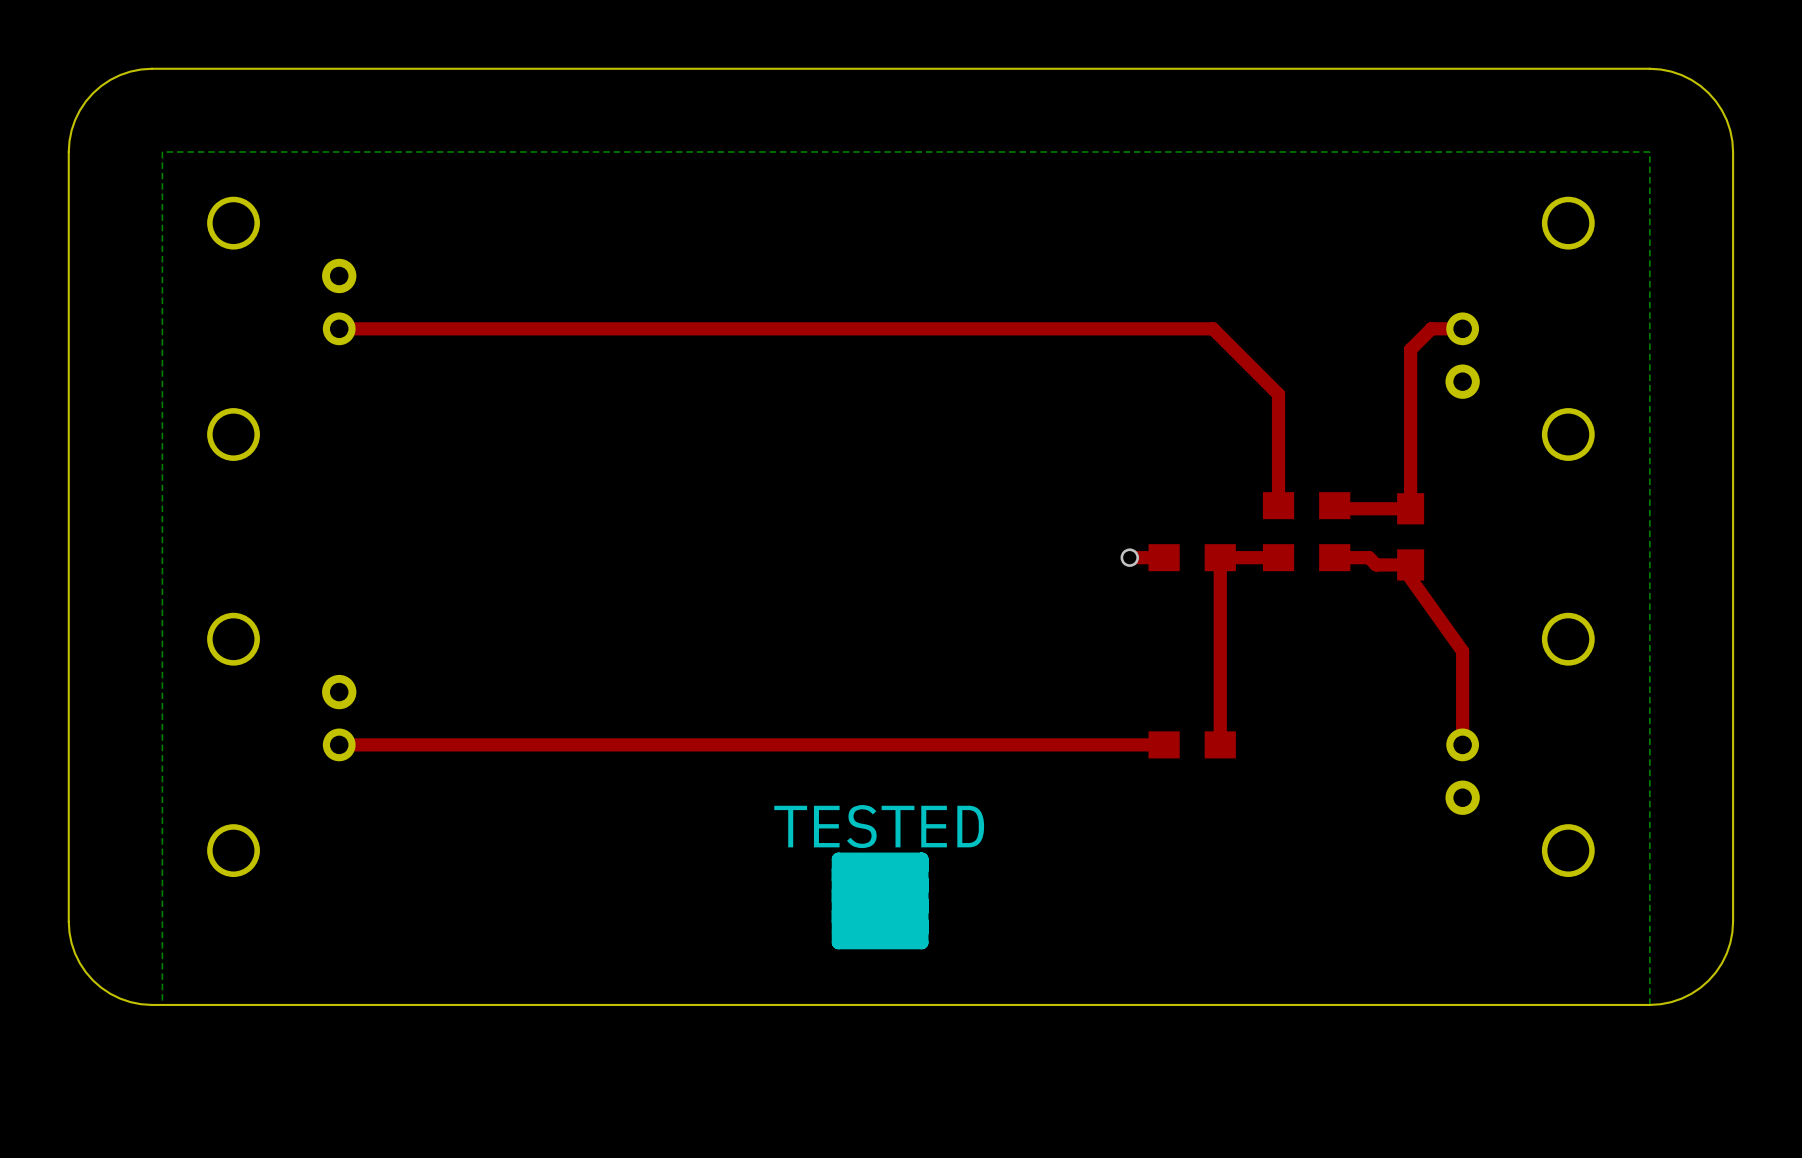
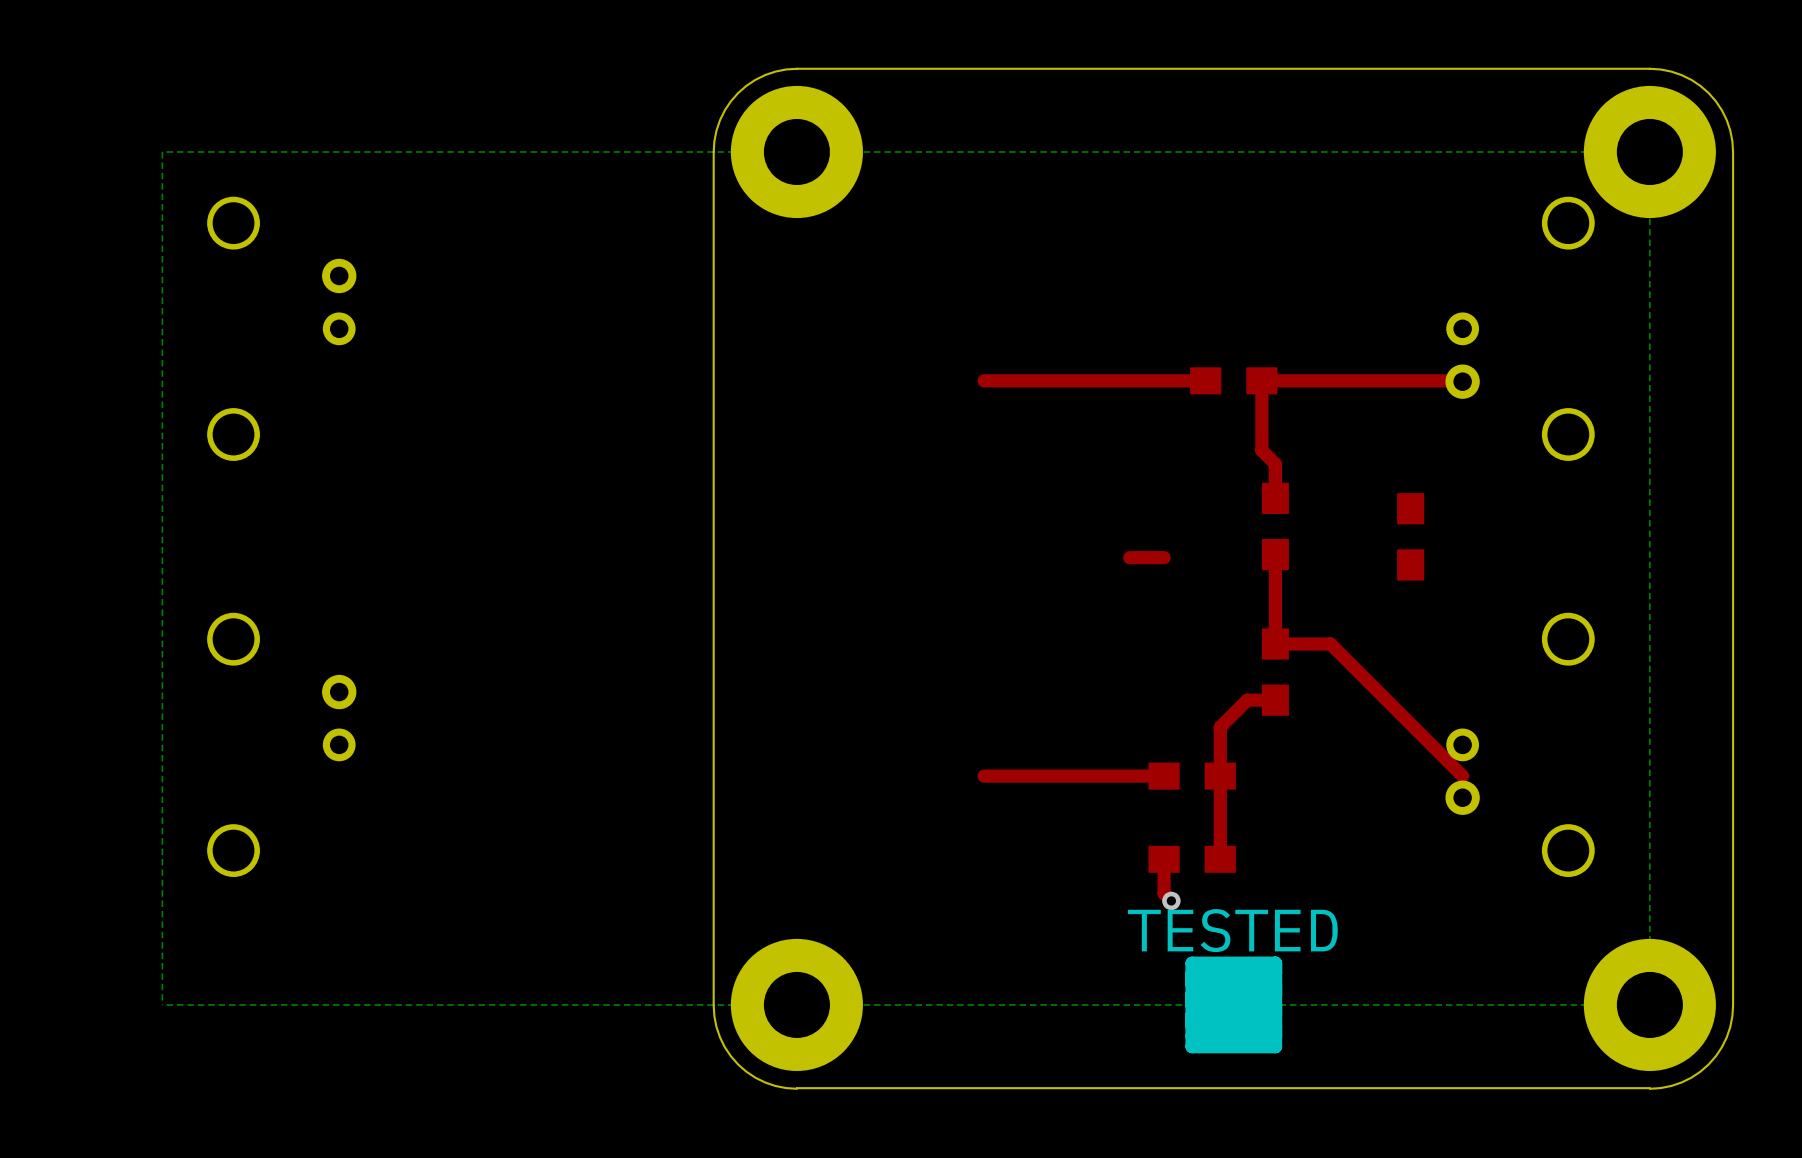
board edge: (796, 68) (151, 68) (120, 75) (101, 85) (85, 101) (71, 130) (68, 151) (68, 921) (75, 953) (93, 980) (120, 998) (151, 1004) (1649, 1004) (1681, 998) (1708, 980) (1726, 953) (1733, 921) -> (796, 68) (765, 75) (746, 85) (724, 110) (714, 141) (713, 1004)
part: none -> (796, 151)
part: none -> (1649, 151)
top track: (339, 328) (1212, 328) (1278, 394) (1278, 505) -> none
top track: (1462, 328) (1431, 328) (1410, 349) (1410, 508) (1337, 508) (1334, 505) -> none
top track: none -> (1205, 380) (984, 380)
part: none -> (1233, 380)
top track: none -> (1462, 380) (1261, 380) (1261, 450) (1275, 464) (1275, 498)
part: (1306, 505) -> none
part: none -> (1275, 526)
top track: none -> (1275, 554) (1275, 644) (1330, 644) (1462, 776)
via: (1129, 557) -> none
part: (1192, 557) -> none
top track: (1278, 557) (1220, 557) (1220, 727) -> (1275, 700) (1247, 700) (1220, 727)
part: (1306, 557) -> none
top track: (1334, 557) (1369, 557) (1376, 564) (1410, 564) -> none
top track: (1410, 578) (1462, 651) (1462, 744) -> none
part: none -> (1275, 672)
top track: (1164, 744) (339, 744) -> none
part position: (1192, 744) -> (1192, 776)
top track: none -> (1220, 744) (1220, 859)
top track: none -> (1164, 776) (984, 776)
top track: none -> (1164, 859) (1164, 893) (1171, 900)
part: none -> (1192, 859)
TESTED position: (880, 900) -> (1233, 1004)
via: none -> (1171, 900)
board edge: none -> (1733, 921) (1733, 1004)
part: none -> (796, 1004)
part: none -> (1649, 1004)
board edge: none -> (713, 1005) (720, 1037) (738, 1064) (765, 1082) (796, 1088)
board edge: none -> (1733, 1005) (1726, 1037) (1708, 1064) (1681, 1082) (1649, 1088)
board edge: none -> (1649, 1088) (796, 1088)

